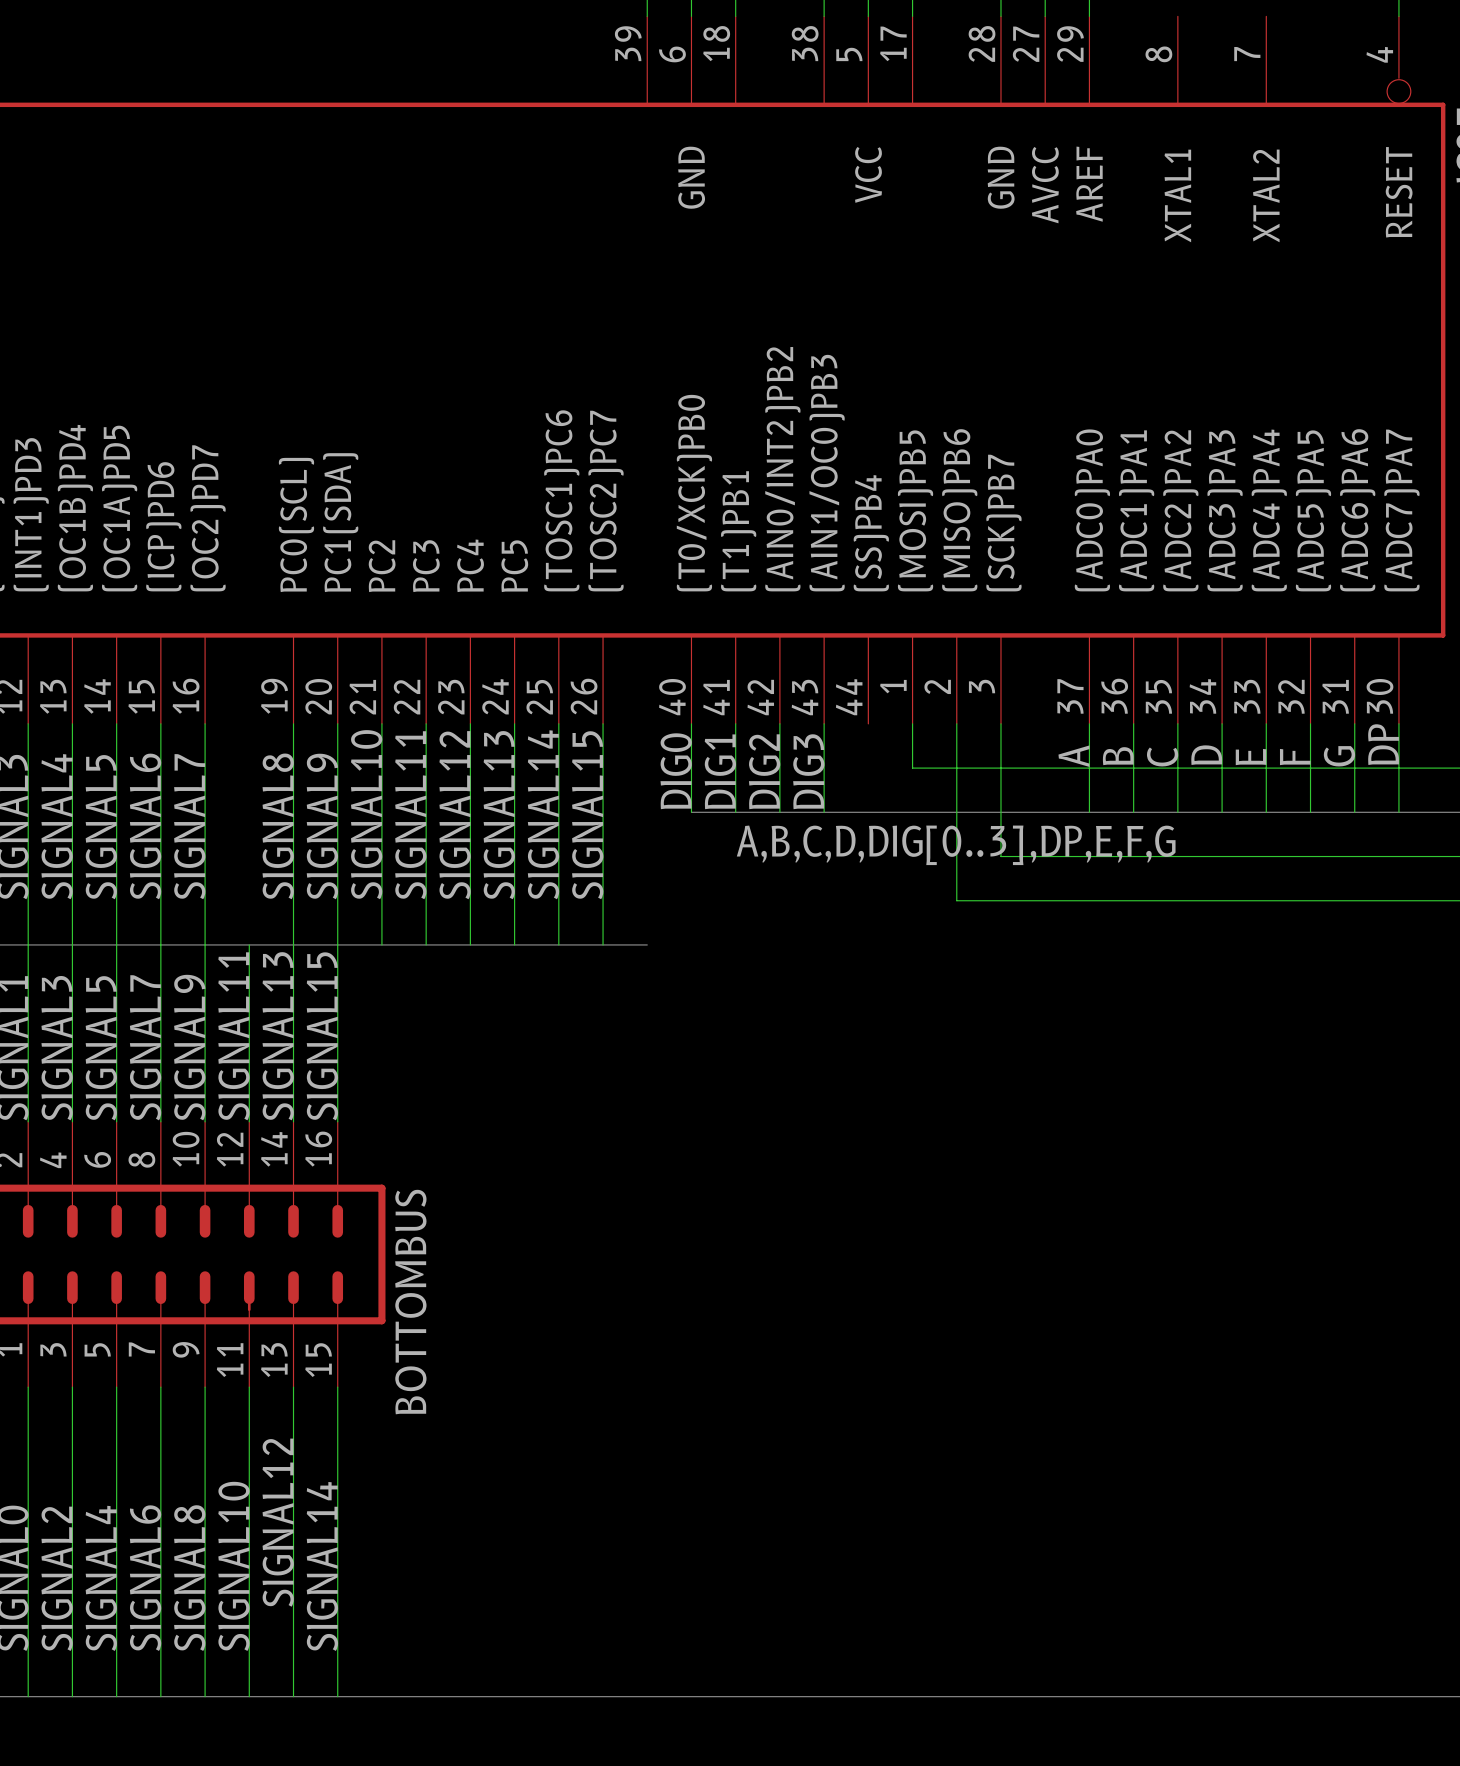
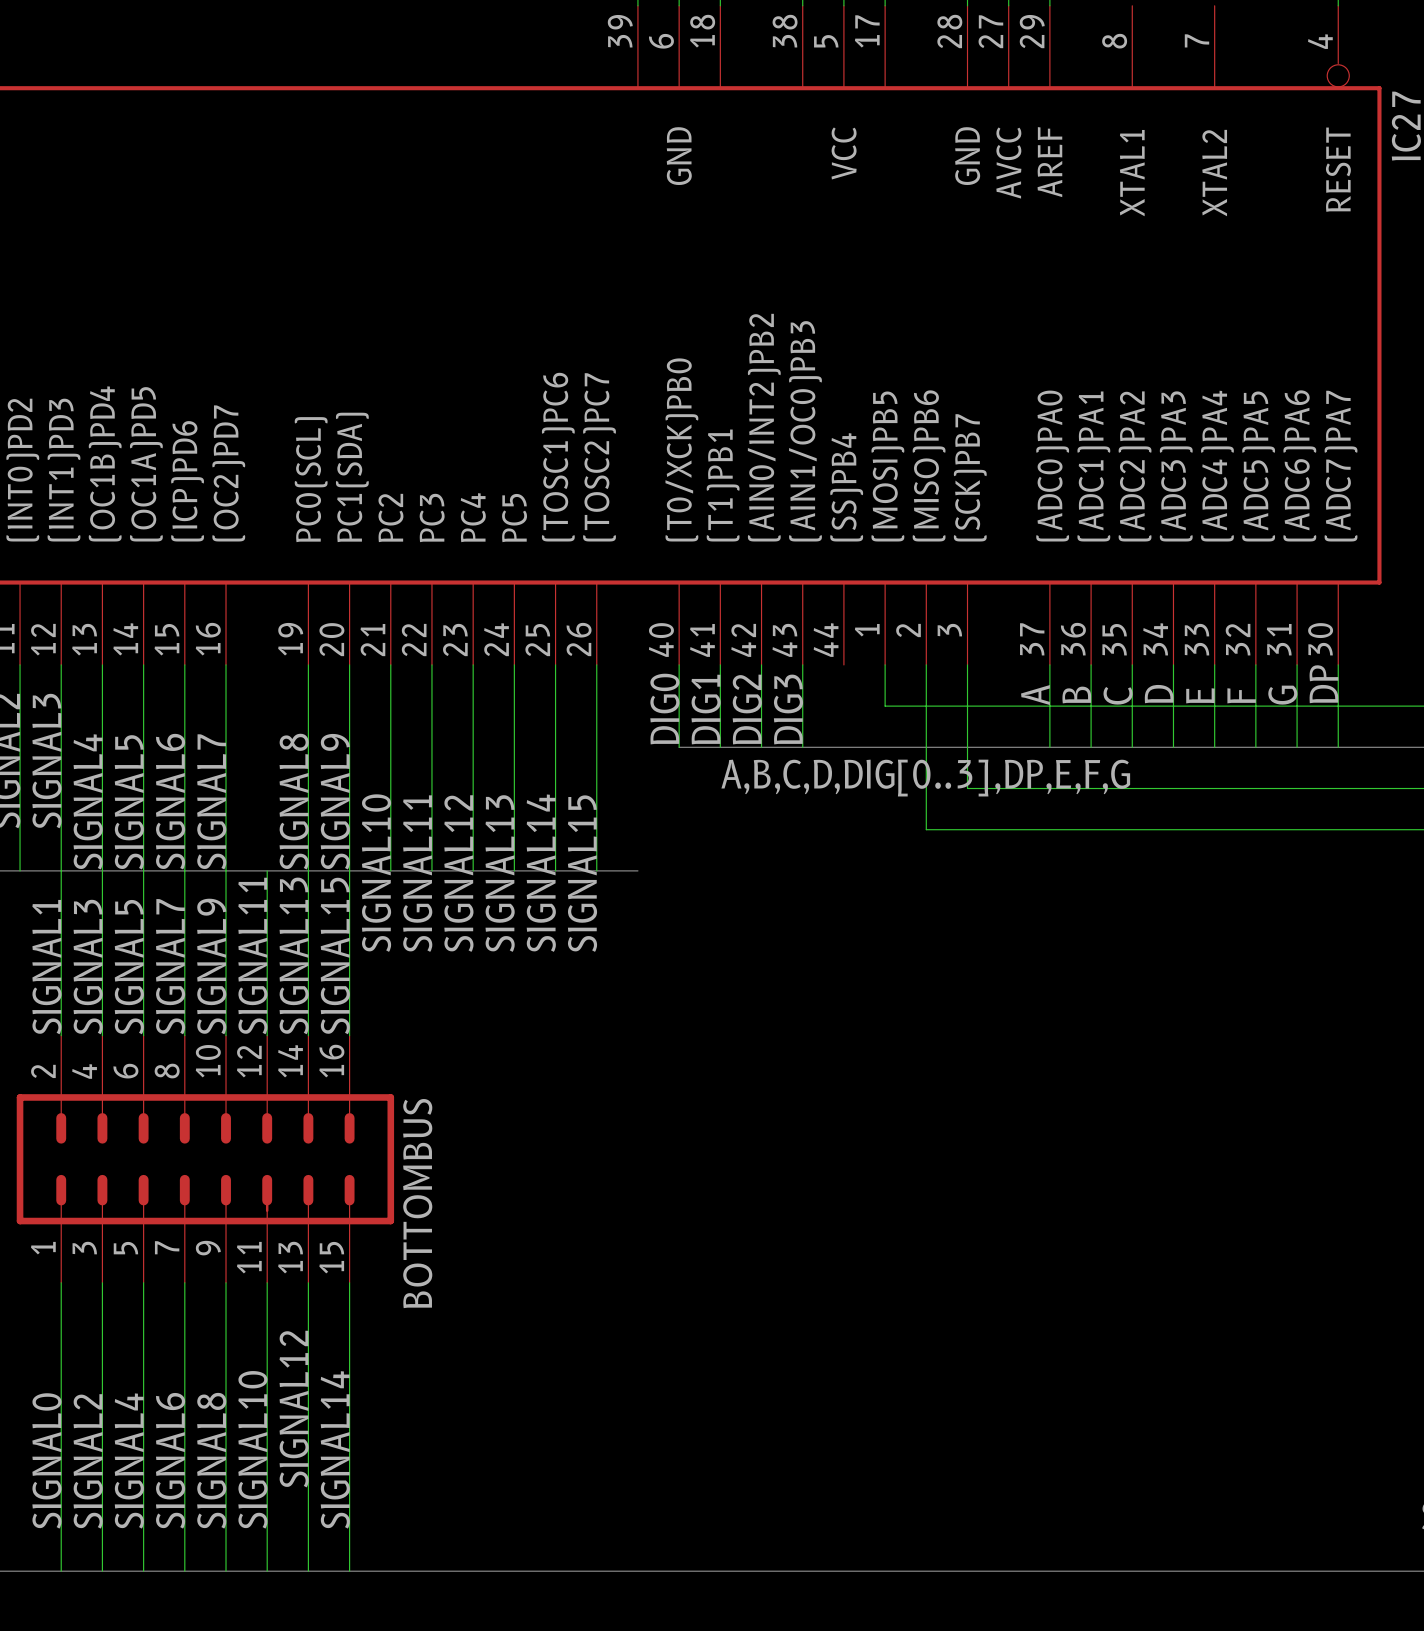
label position: SIGNAL10 (366, 814) -> SIGNAL10 (376, 873)
label position: SIGNAL14 (543, 814) -> SIGNAL14 (541, 873)
label position: SIGNAL11 (410, 815) -> SIGNAL11 (417, 873)
label position: SIGNAL12 (455, 815) -> SIGNAL12 (458, 873)
label position: SIGNAL13 (499, 815) -> SIGNAL13 (500, 873)
label position: SIGNAL15 (587, 815) -> SIGNAL15 (582, 873)
label position: SIGNAL4 (57, 826) -> SIGNAL4 (88, 801)
label position: SIGNAL6 (145, 826) -> SIGNAL6 (170, 801)
label position: SIGNAL7 (189, 826) -> SIGNAL7 (211, 801)
label position: SIGNAL8 (278, 826) -> SIGNAL8 (294, 801)
label position: SIGNAL9 (322, 826) -> SIGNAL9 (335, 801)
label position: SIGNAL5 (101, 827) -> SIGNAL5 (129, 802)

